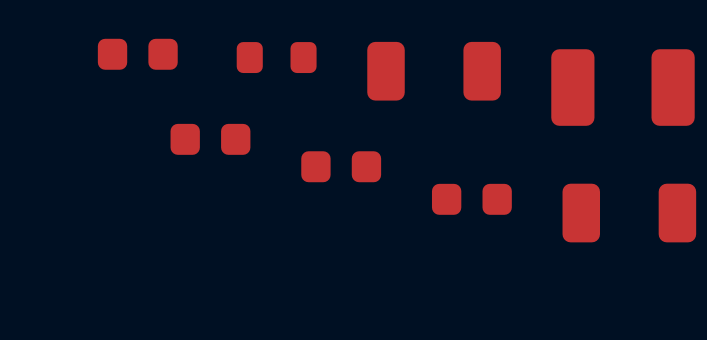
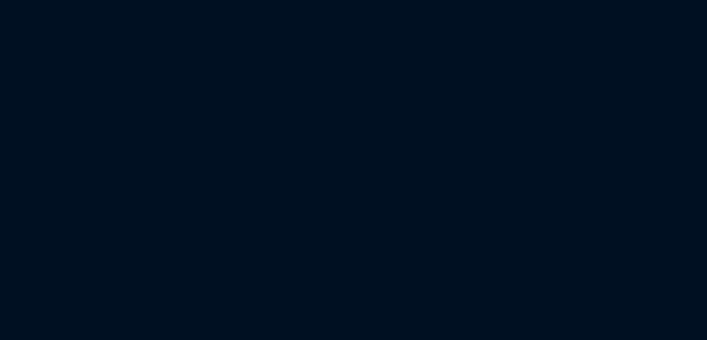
part: (137, 54) -> none
part: (276, 57) -> none
part: (434, 71) -> none
part: (622, 87) -> none
part: (210, 139) -> none
part: (341, 166) -> none
part: (471, 199) -> none
part: (629, 213) -> none

